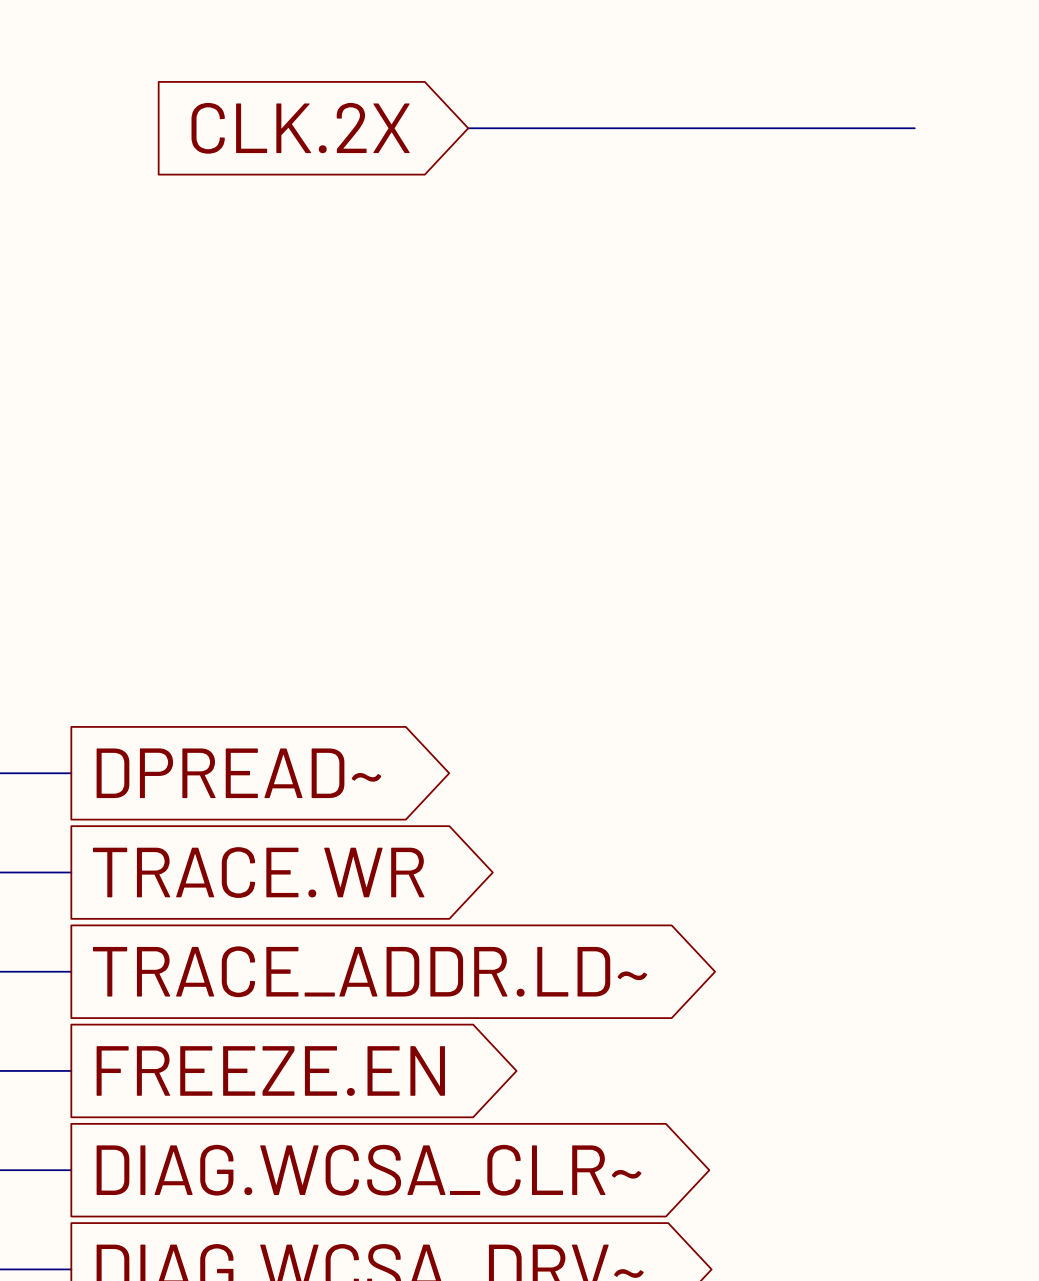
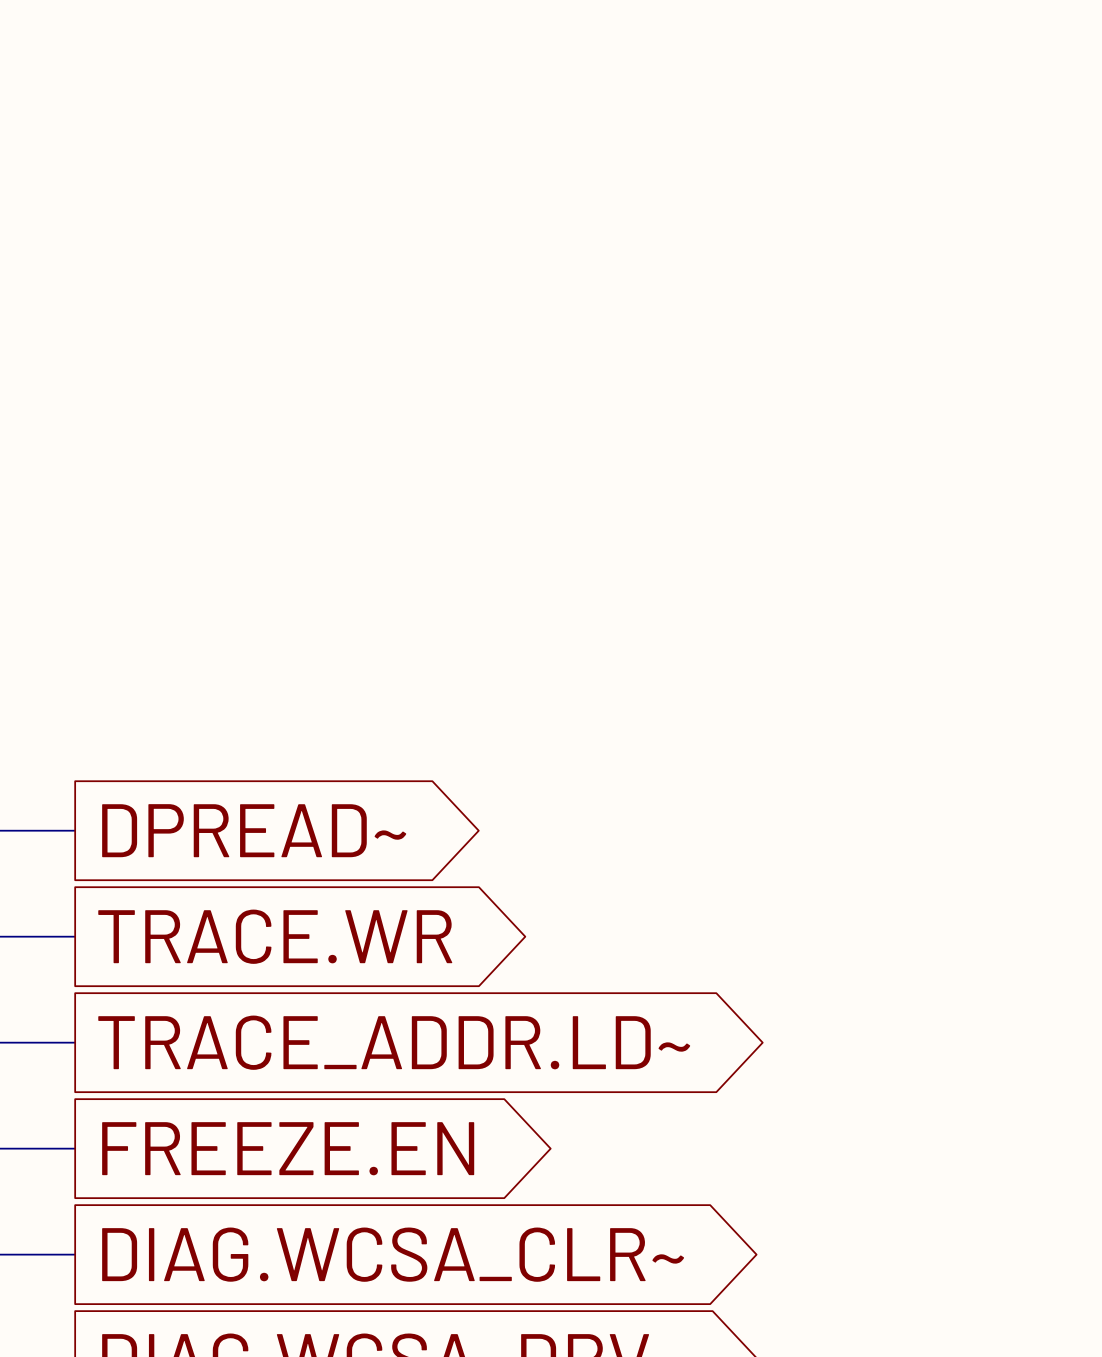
global label: CLK.2X (300, 128) -> none
wire: (468, 128) (914, 128) -> none

